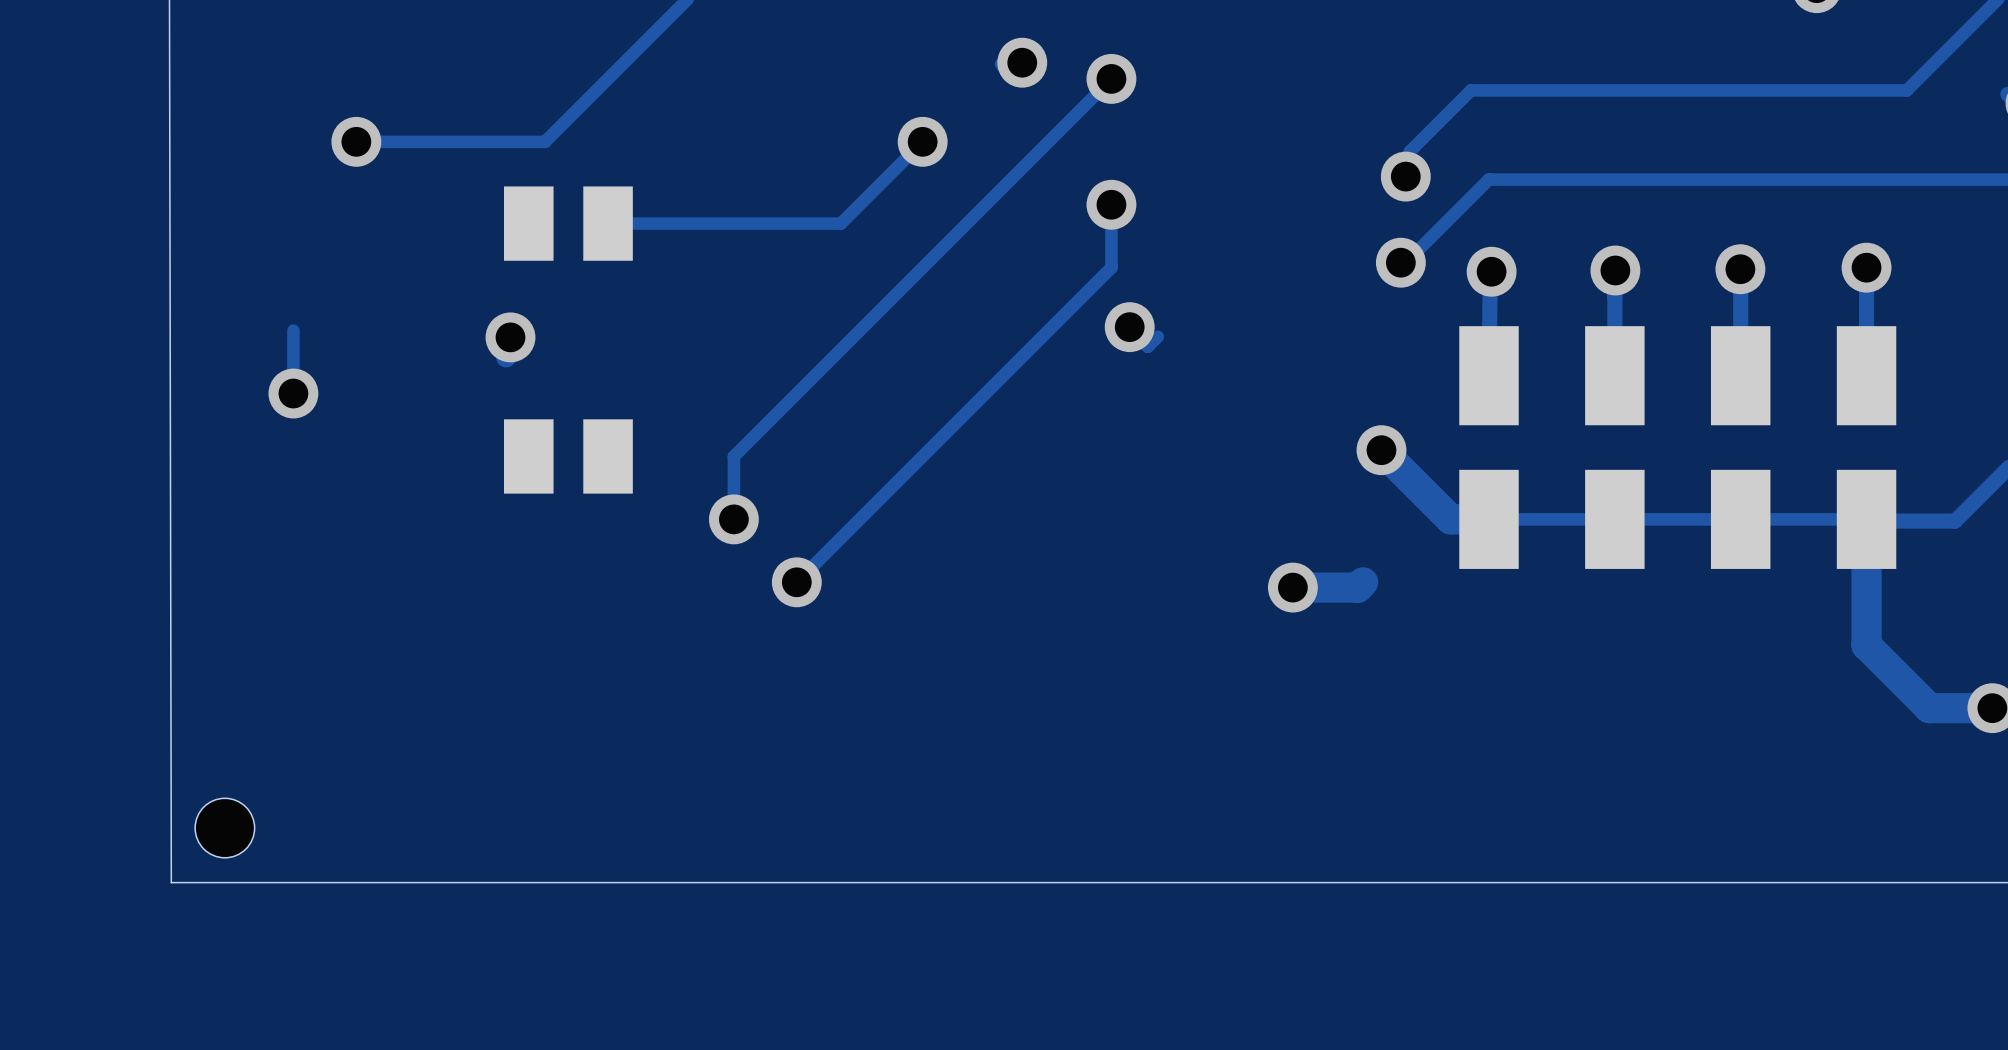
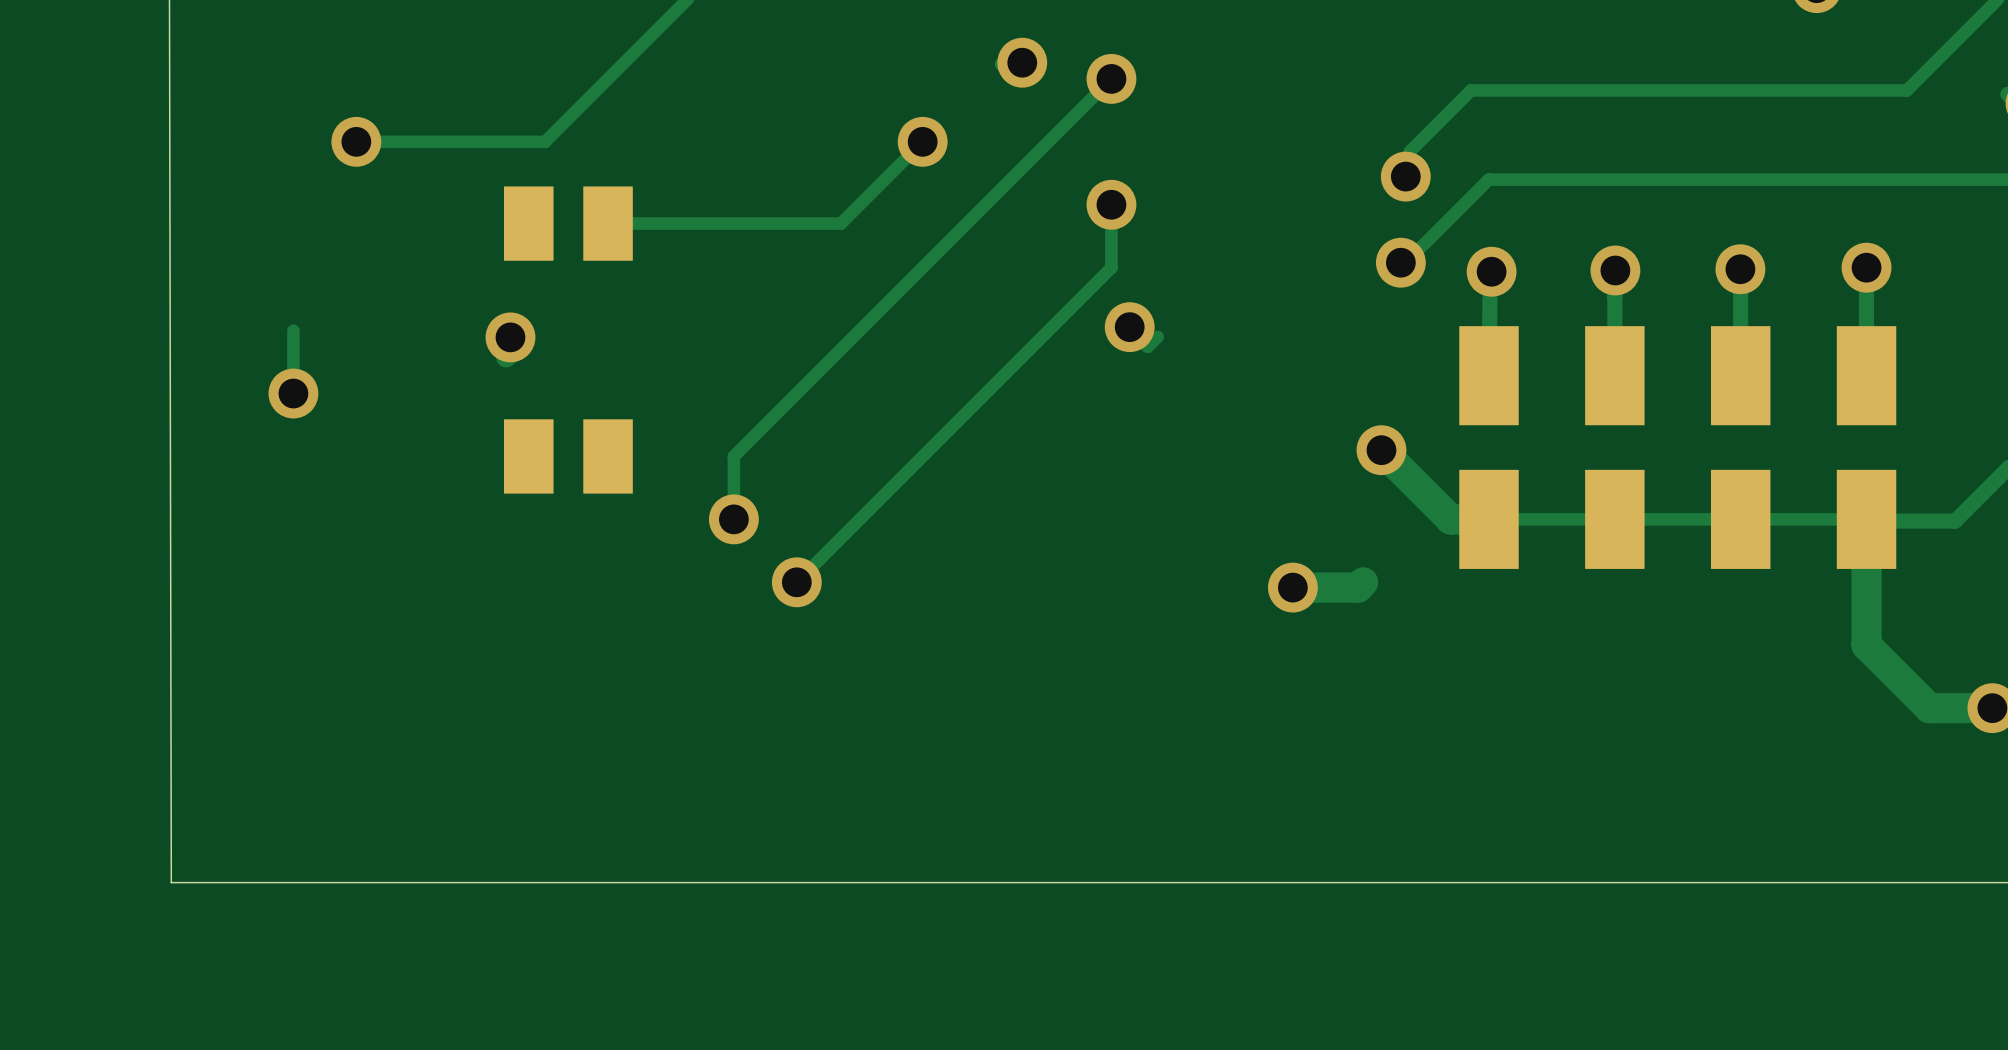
hole: (224, 828) -> none

